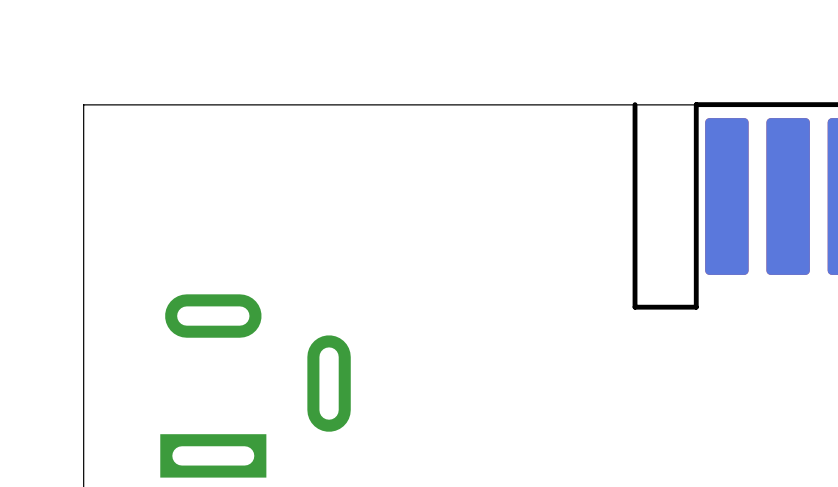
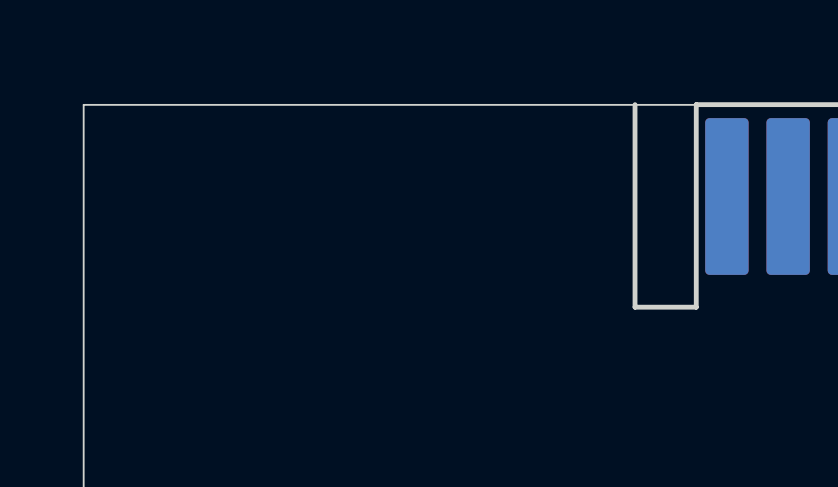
part: (255, 385) -> none

